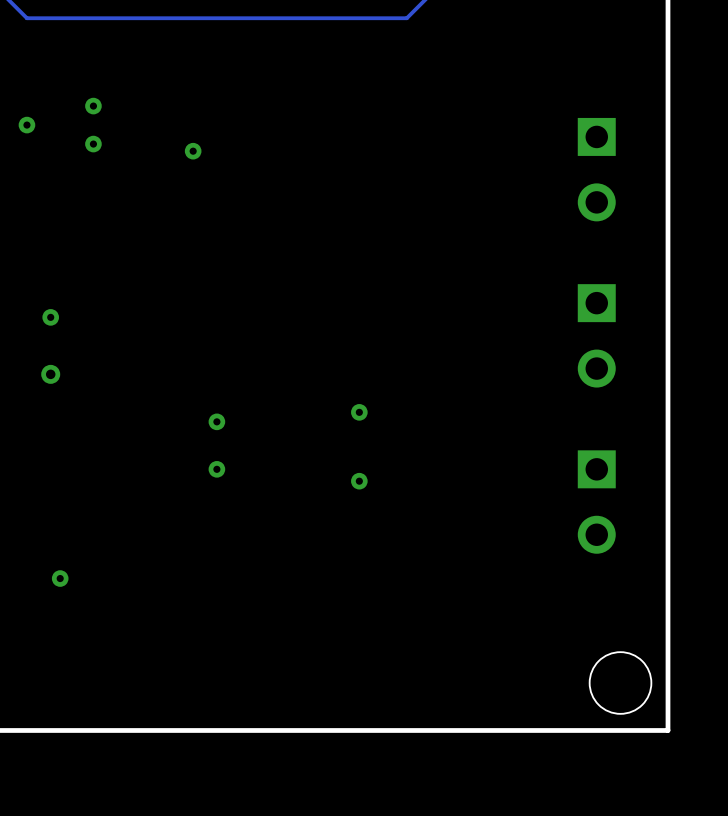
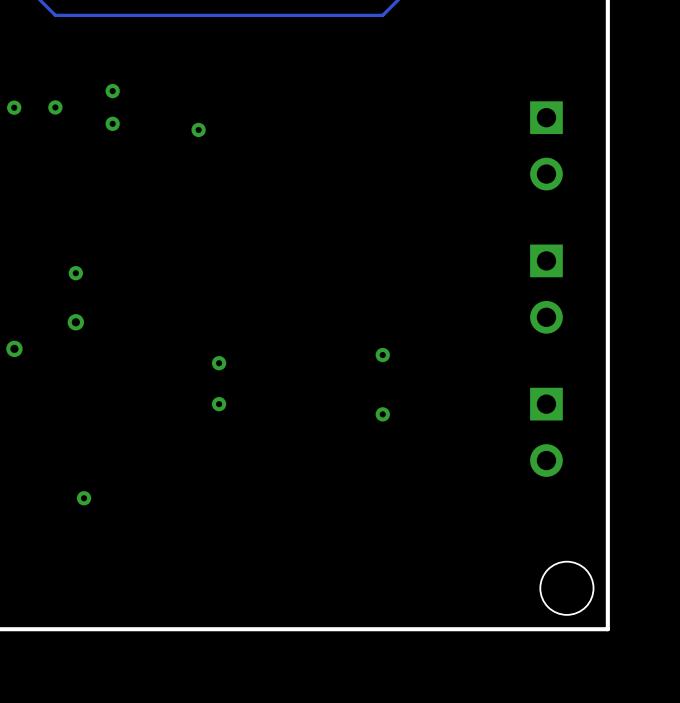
via: (359, 412) -> none
via: none -> (382, 355)
via: (359, 481) -> none
via: none -> (382, 414)

